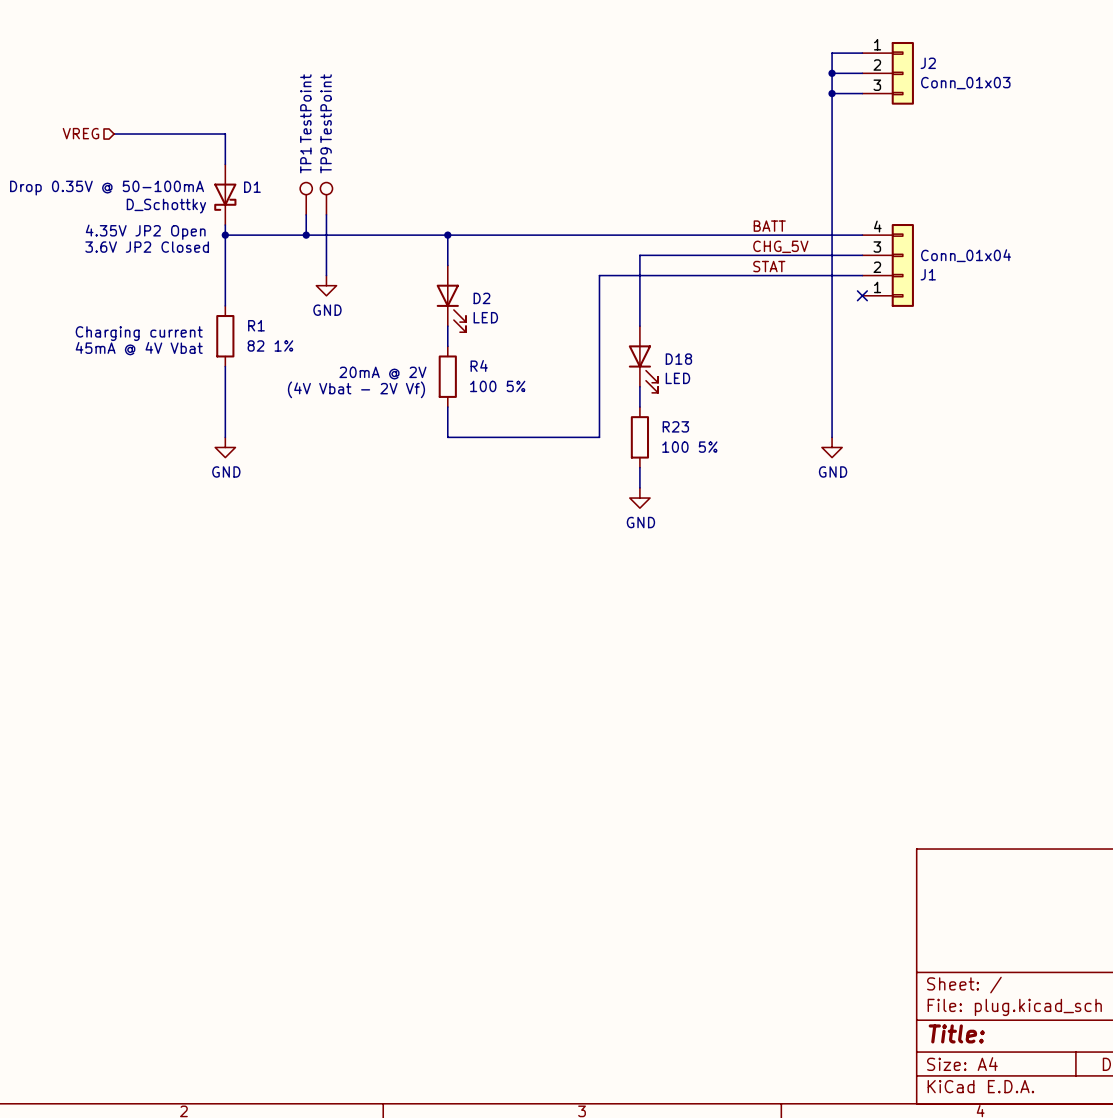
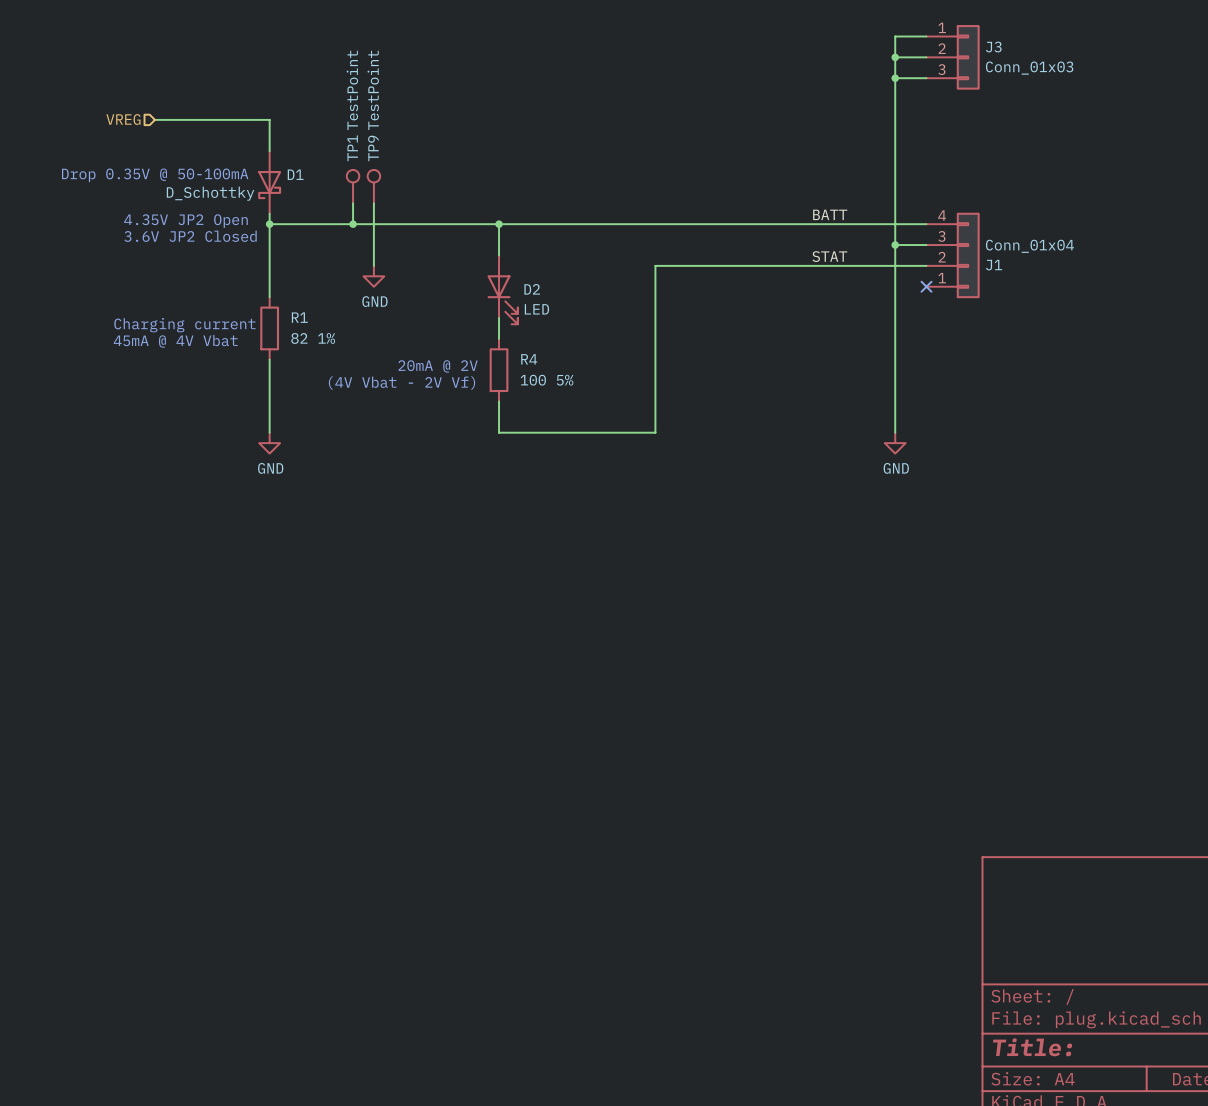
J2 name: J2 (928, 63) -> J3 (993, 47)
label: CHG_5V (780, 246) -> none
wire: (832, 255) (639, 255) (639, 326) -> none
junction: none -> (895, 245)
D18: LED (643, 359) -> none
wire: (639, 386) (639, 407) -> none
R23: 100 5% (639, 437) -> none
wire: (639, 467) (639, 487) -> none
power symbol: GND (639, 498) -> none

